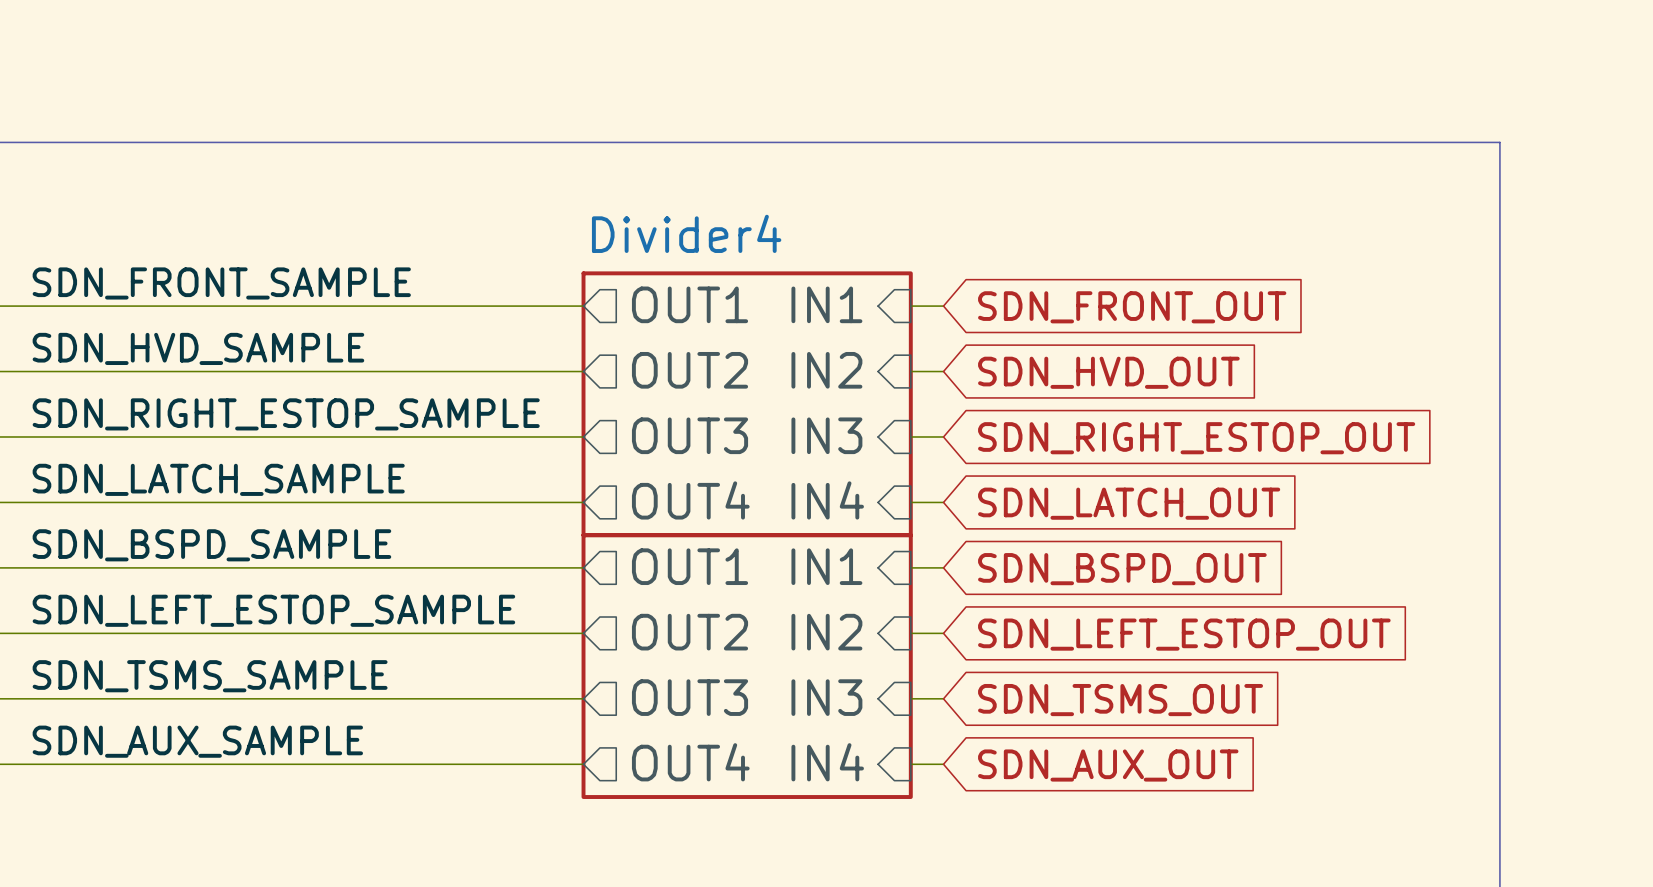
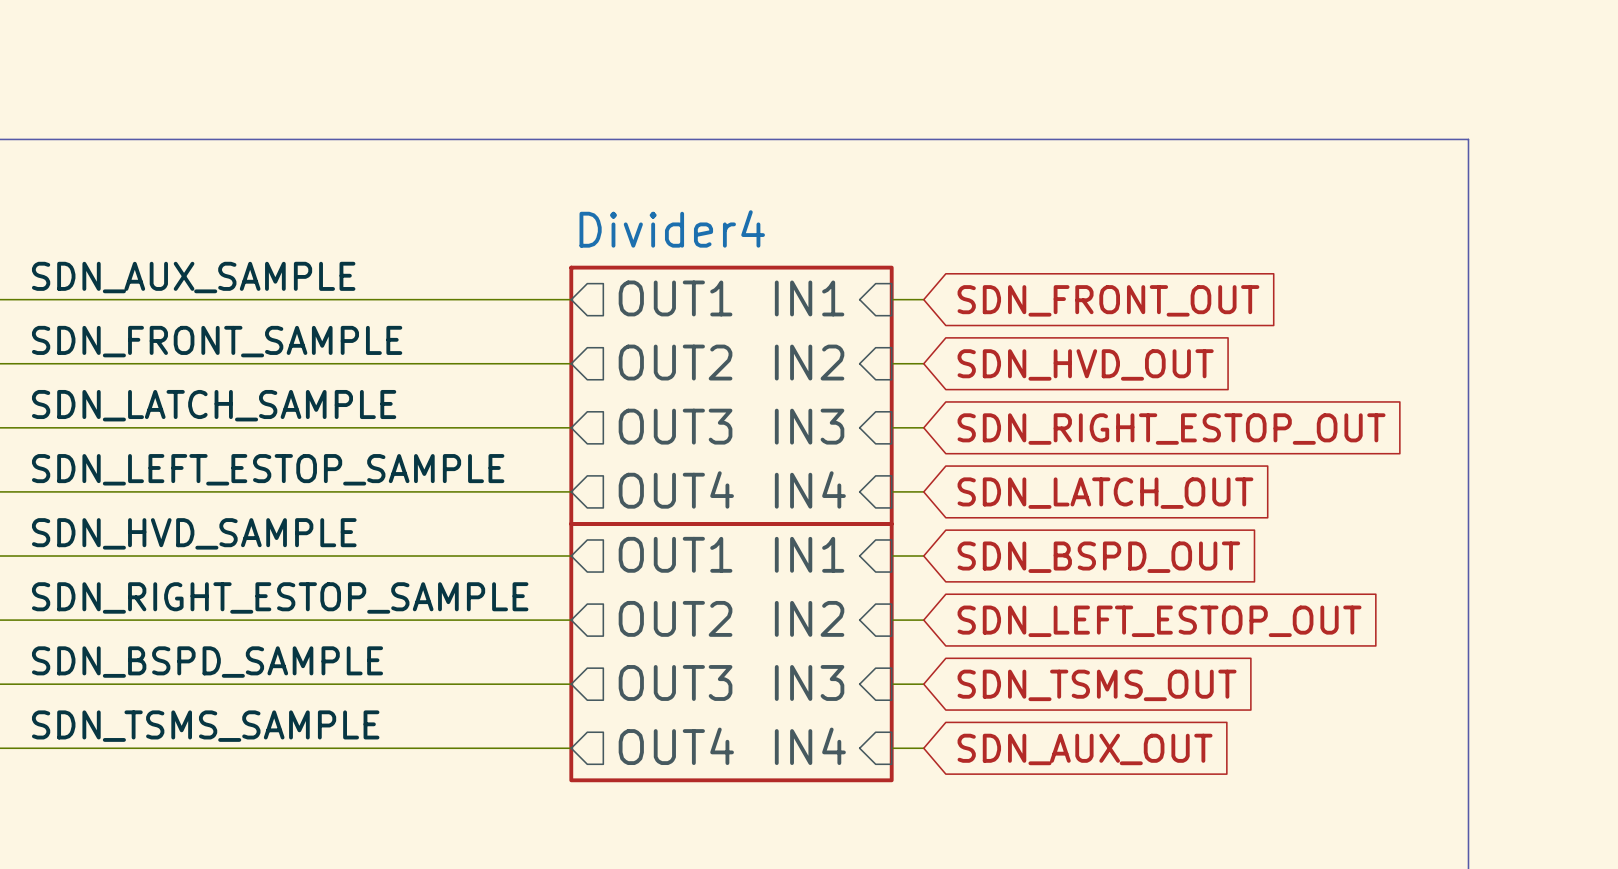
label: SDN_FRONT_SAMPLE (221, 283) -> SDN_AUX_SAMPLE (193, 277)
label: SDN_HVD_SAMPLE (198, 348) -> SDN_FRONT_SAMPLE (217, 341)
label: SDN_RIGHT_ESTOP_SAMPLE (286, 414) -> SDN_LATCH_SAMPLE (214, 405)
label: SDN_LATCH_SAMPLE (218, 479) -> SDN_LEFT_ESTOP_SAMPLE (268, 469)
label: SDN_BSPD_SAMPLE (211, 545) -> SDN_HVD_SAMPLE (194, 533)
label: SDN_LEFT_ESTOP_SAMPLE (273, 610) -> SDN_RIGHT_ESTOP_SAMPLE (280, 597)
label: SDN_TSMS_SAMPLE (210, 676) -> SDN_BSPD_SAMPLE (207, 662)
label: SDN_AUX_SAMPLE (197, 741) -> SDN_TSMS_SAMPLE (205, 726)

